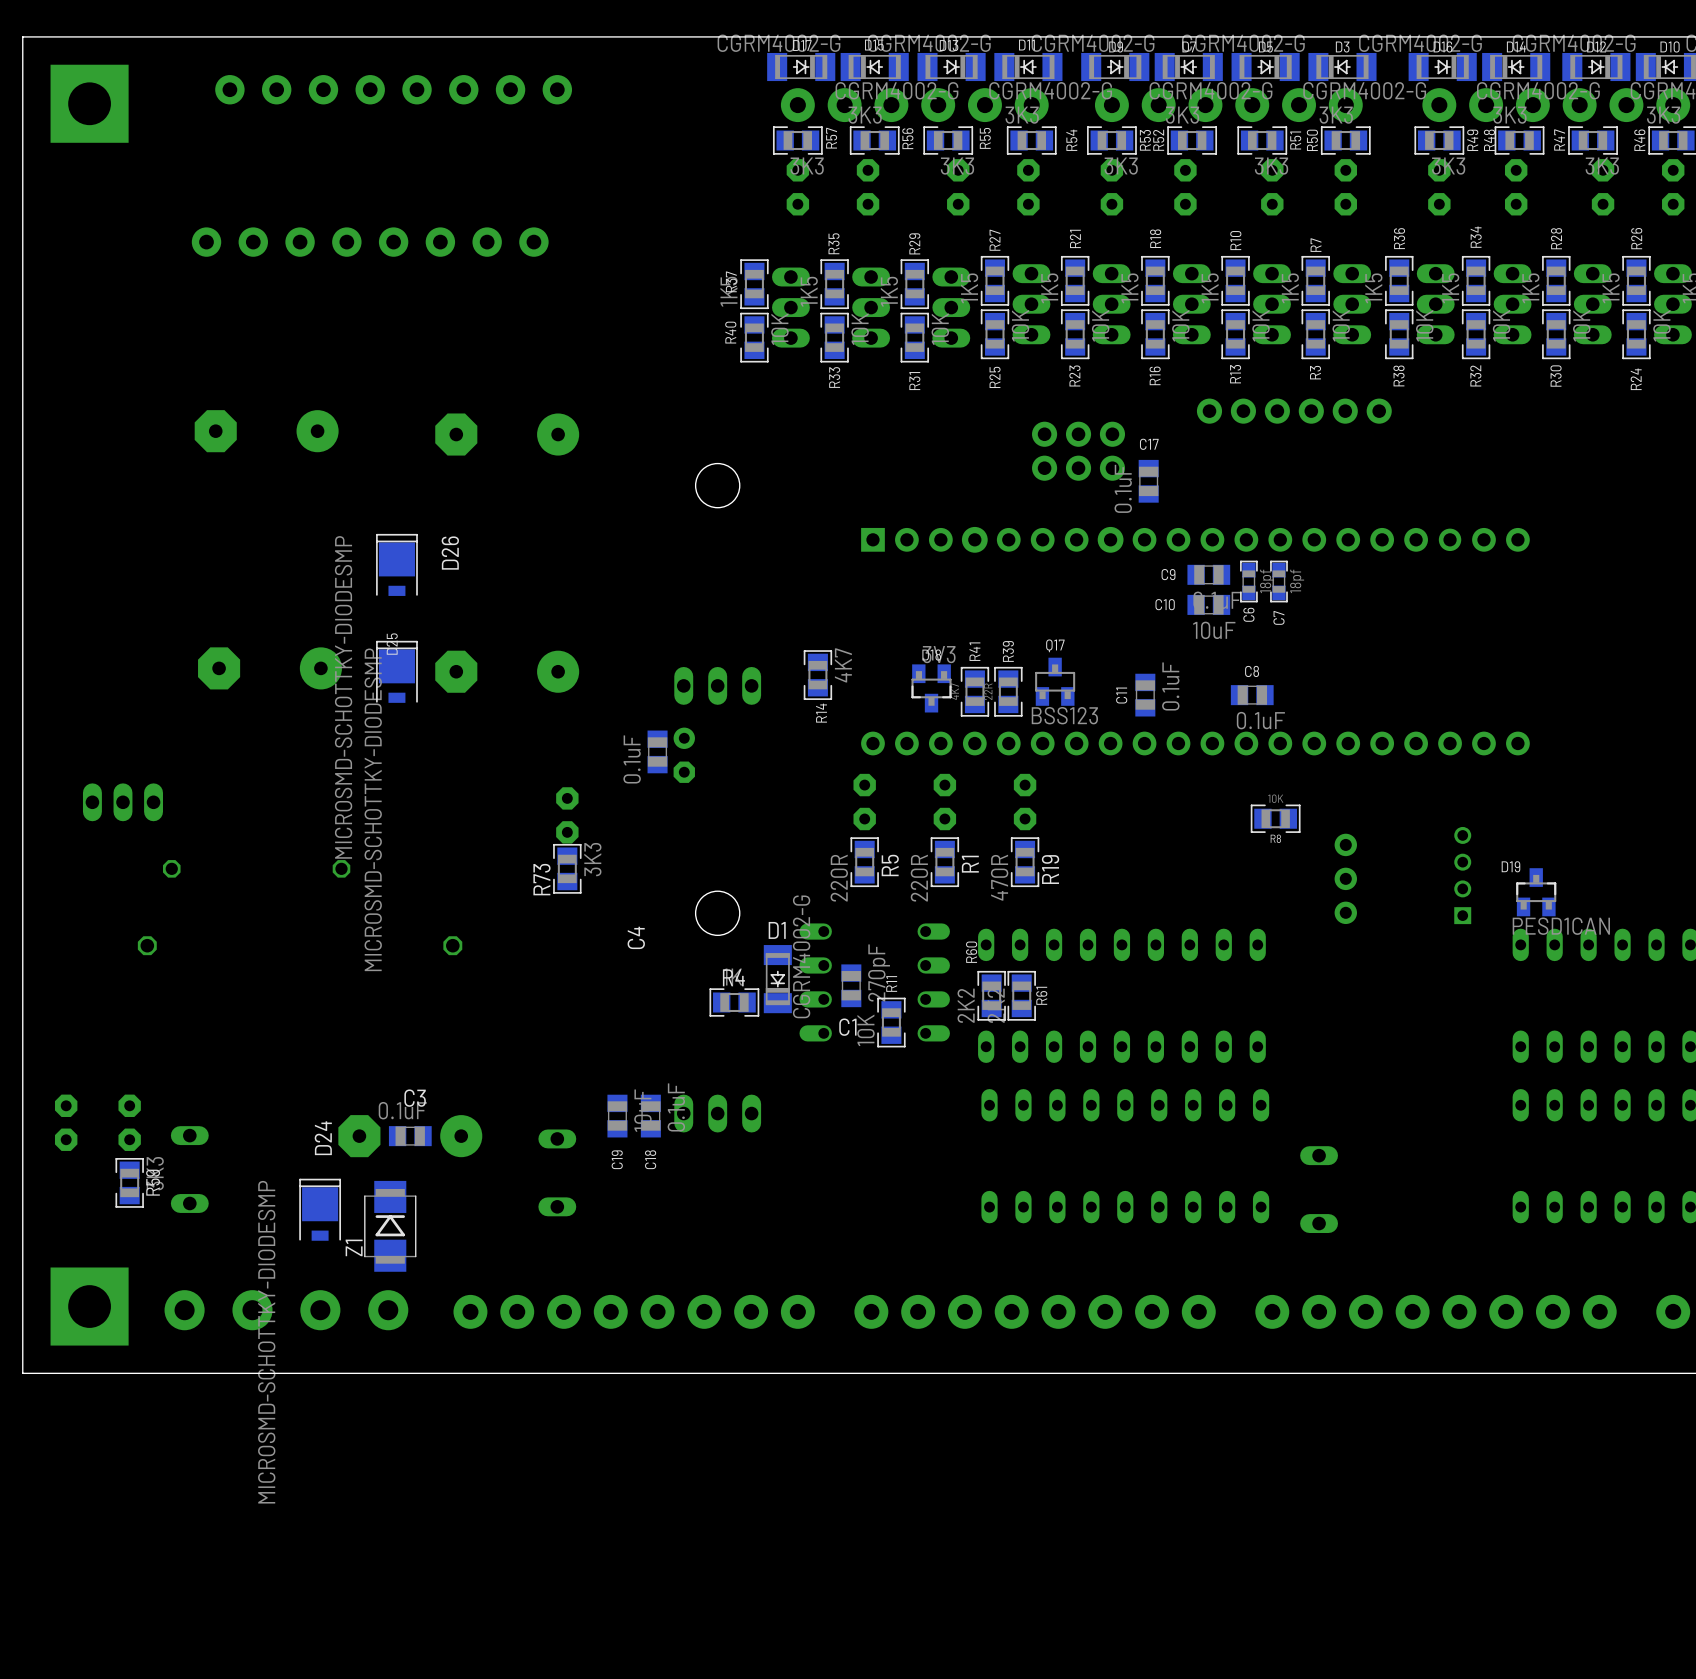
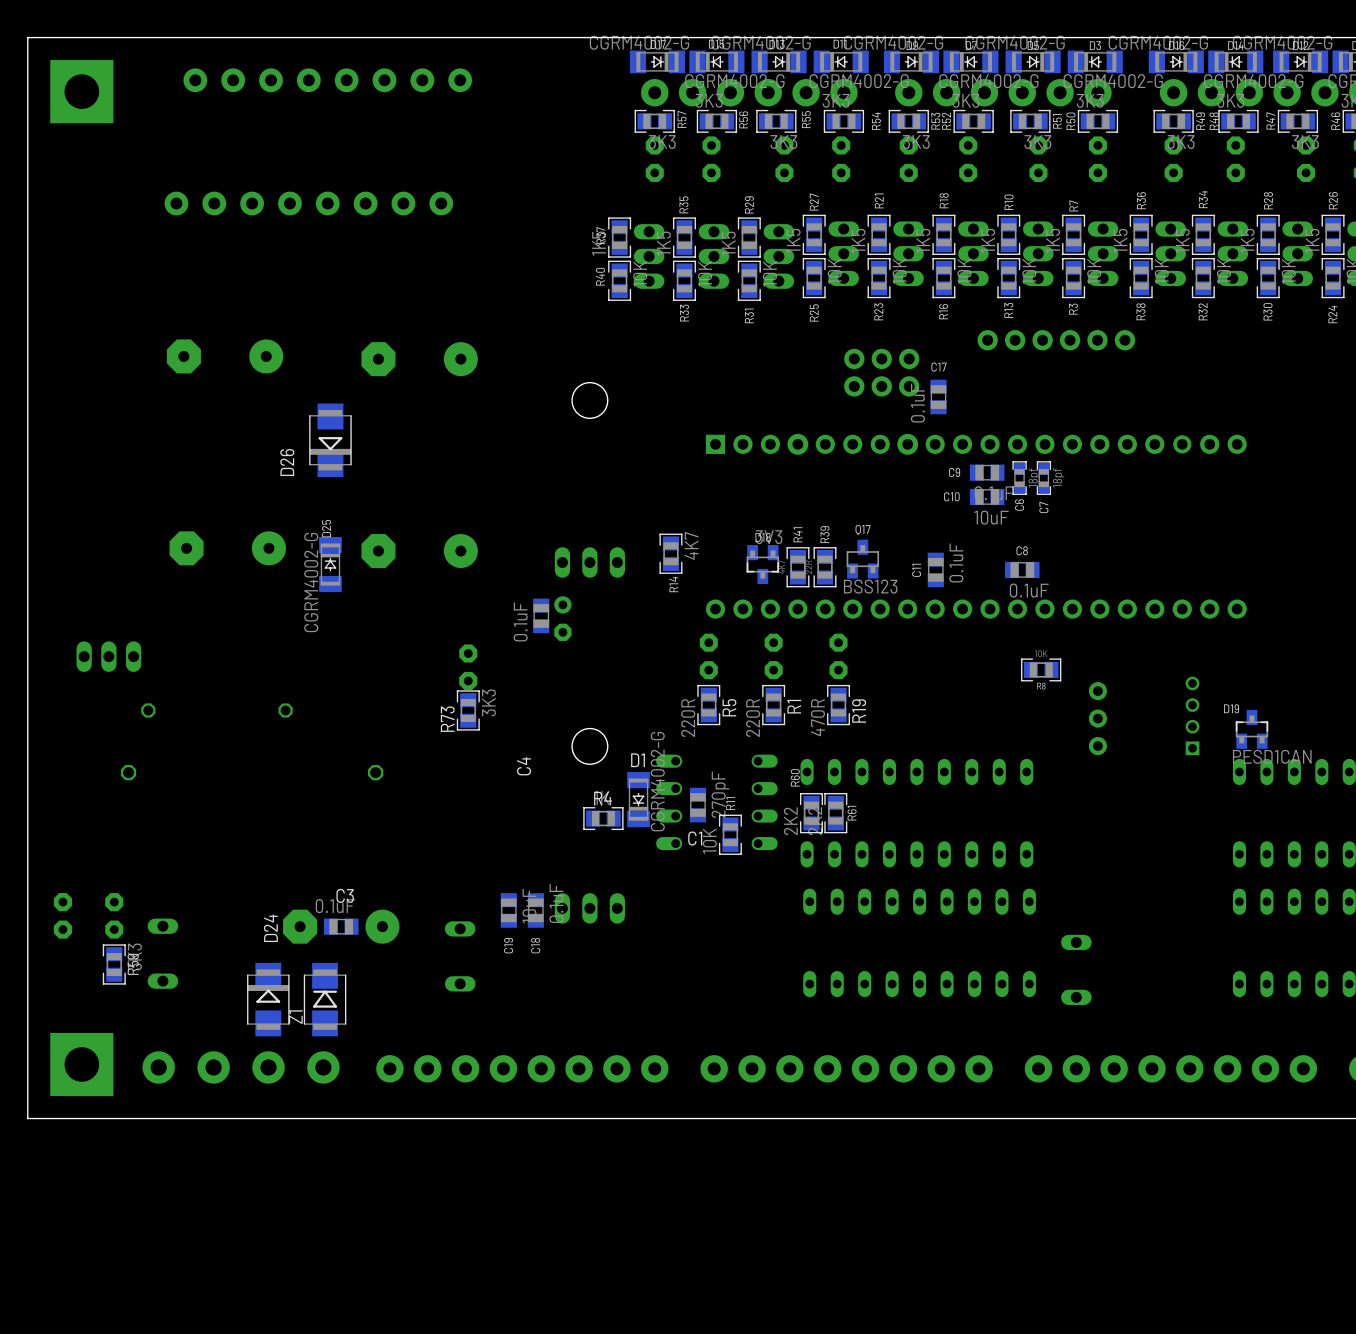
D26 footprint: [376, 533, 418, 596] -> [309, 403, 352, 477]
D26 name position: D26 (450, 553) -> D26 (287, 462)
D25 footprint: [376, 640, 418, 703] -> [319, 536, 342, 593]
D26 value: MICROSMD-SCHOTTKY-DIODESMP (343, 697) -> none
D25 value: MICROSMD-SCHOTTKY-DIODESMP (373, 809) -> CGRM4002-G (311, 582)
D24 footprint: [299, 1178, 342, 1241] -> [247, 962, 290, 1037]
D24 value: MICROSMD-SCHOTTKY-DIODESMP (266, 1342) -> none

